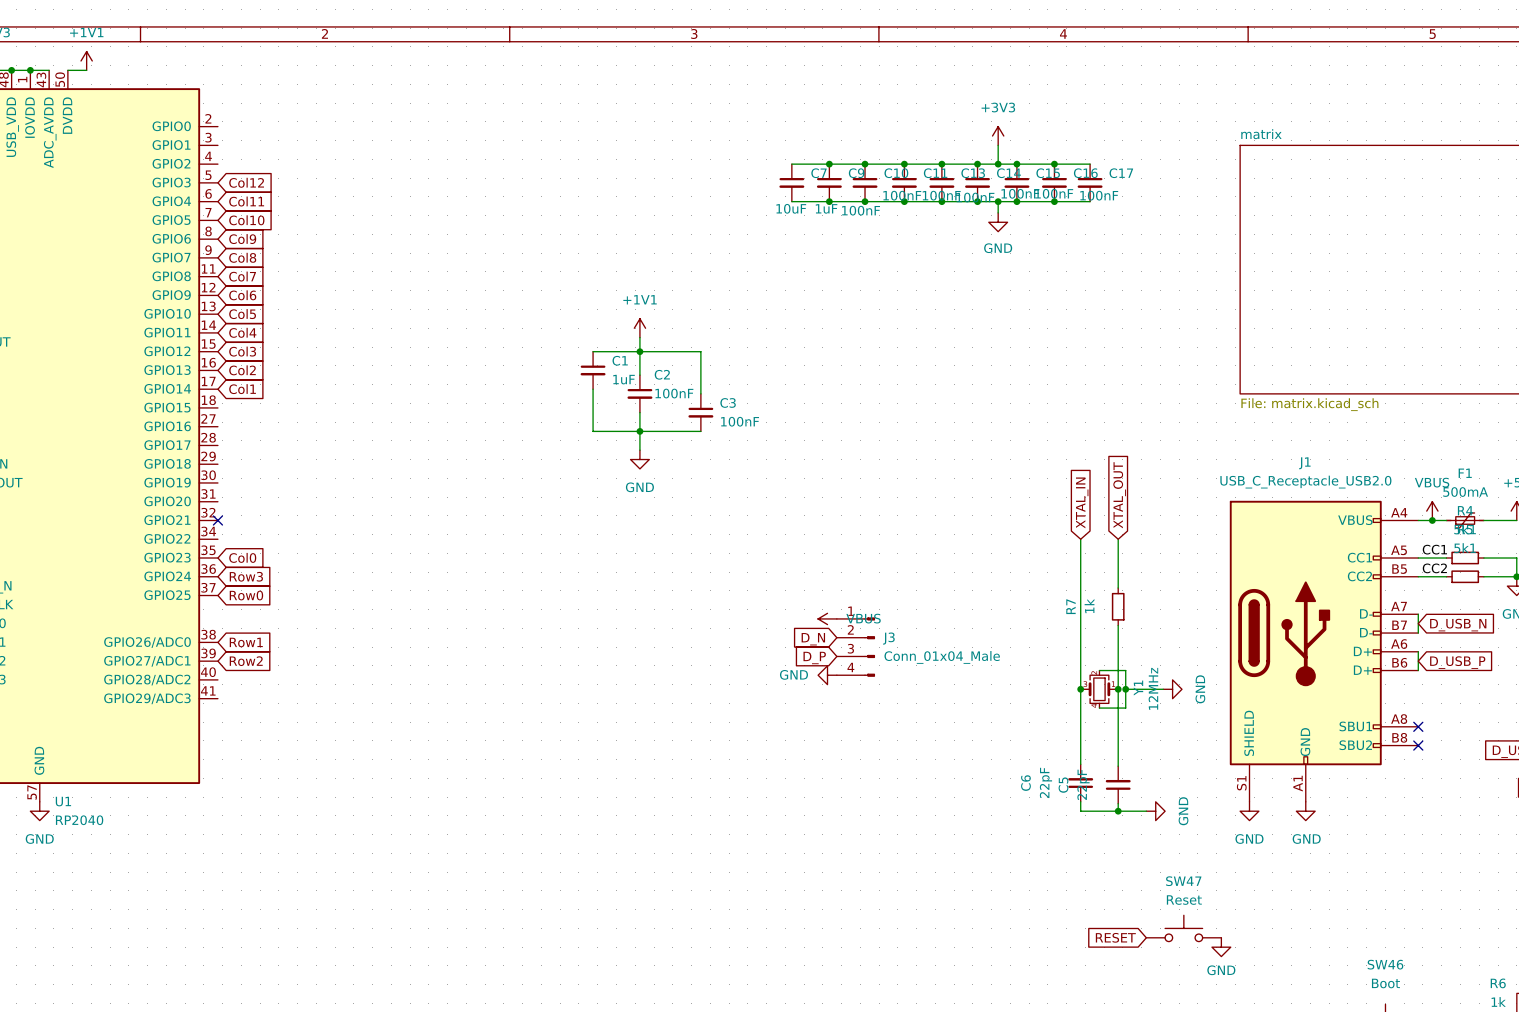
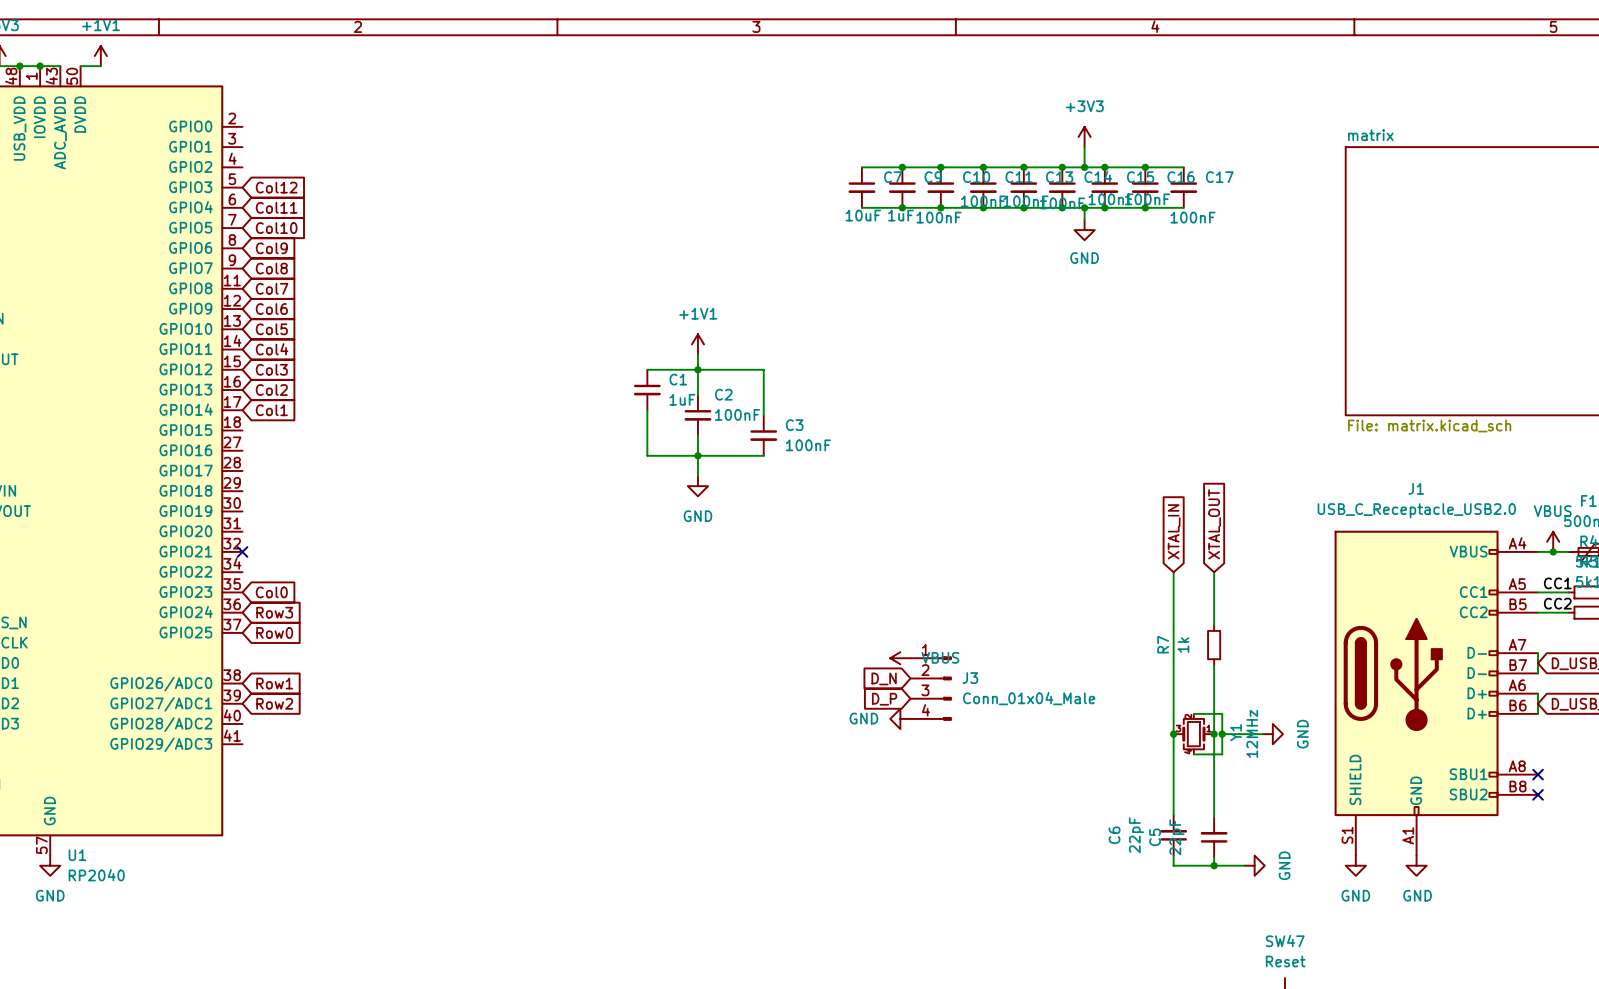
C17 value position: 100nF (1099, 195) -> 100nF (1193, 217)

